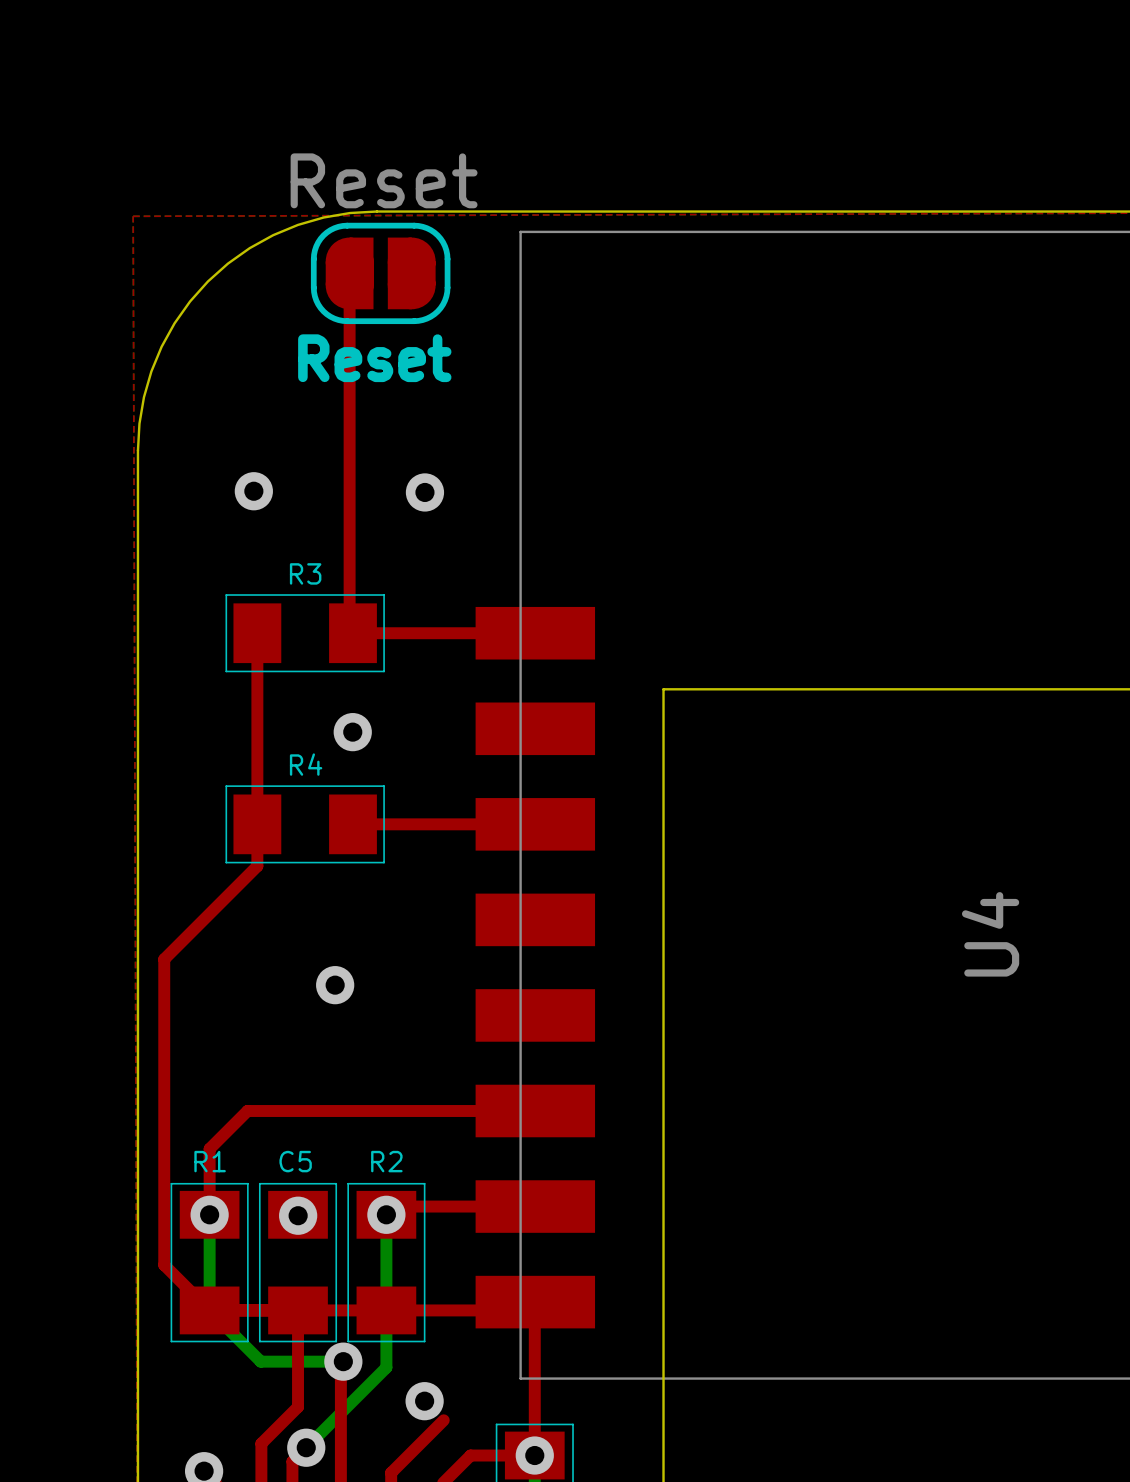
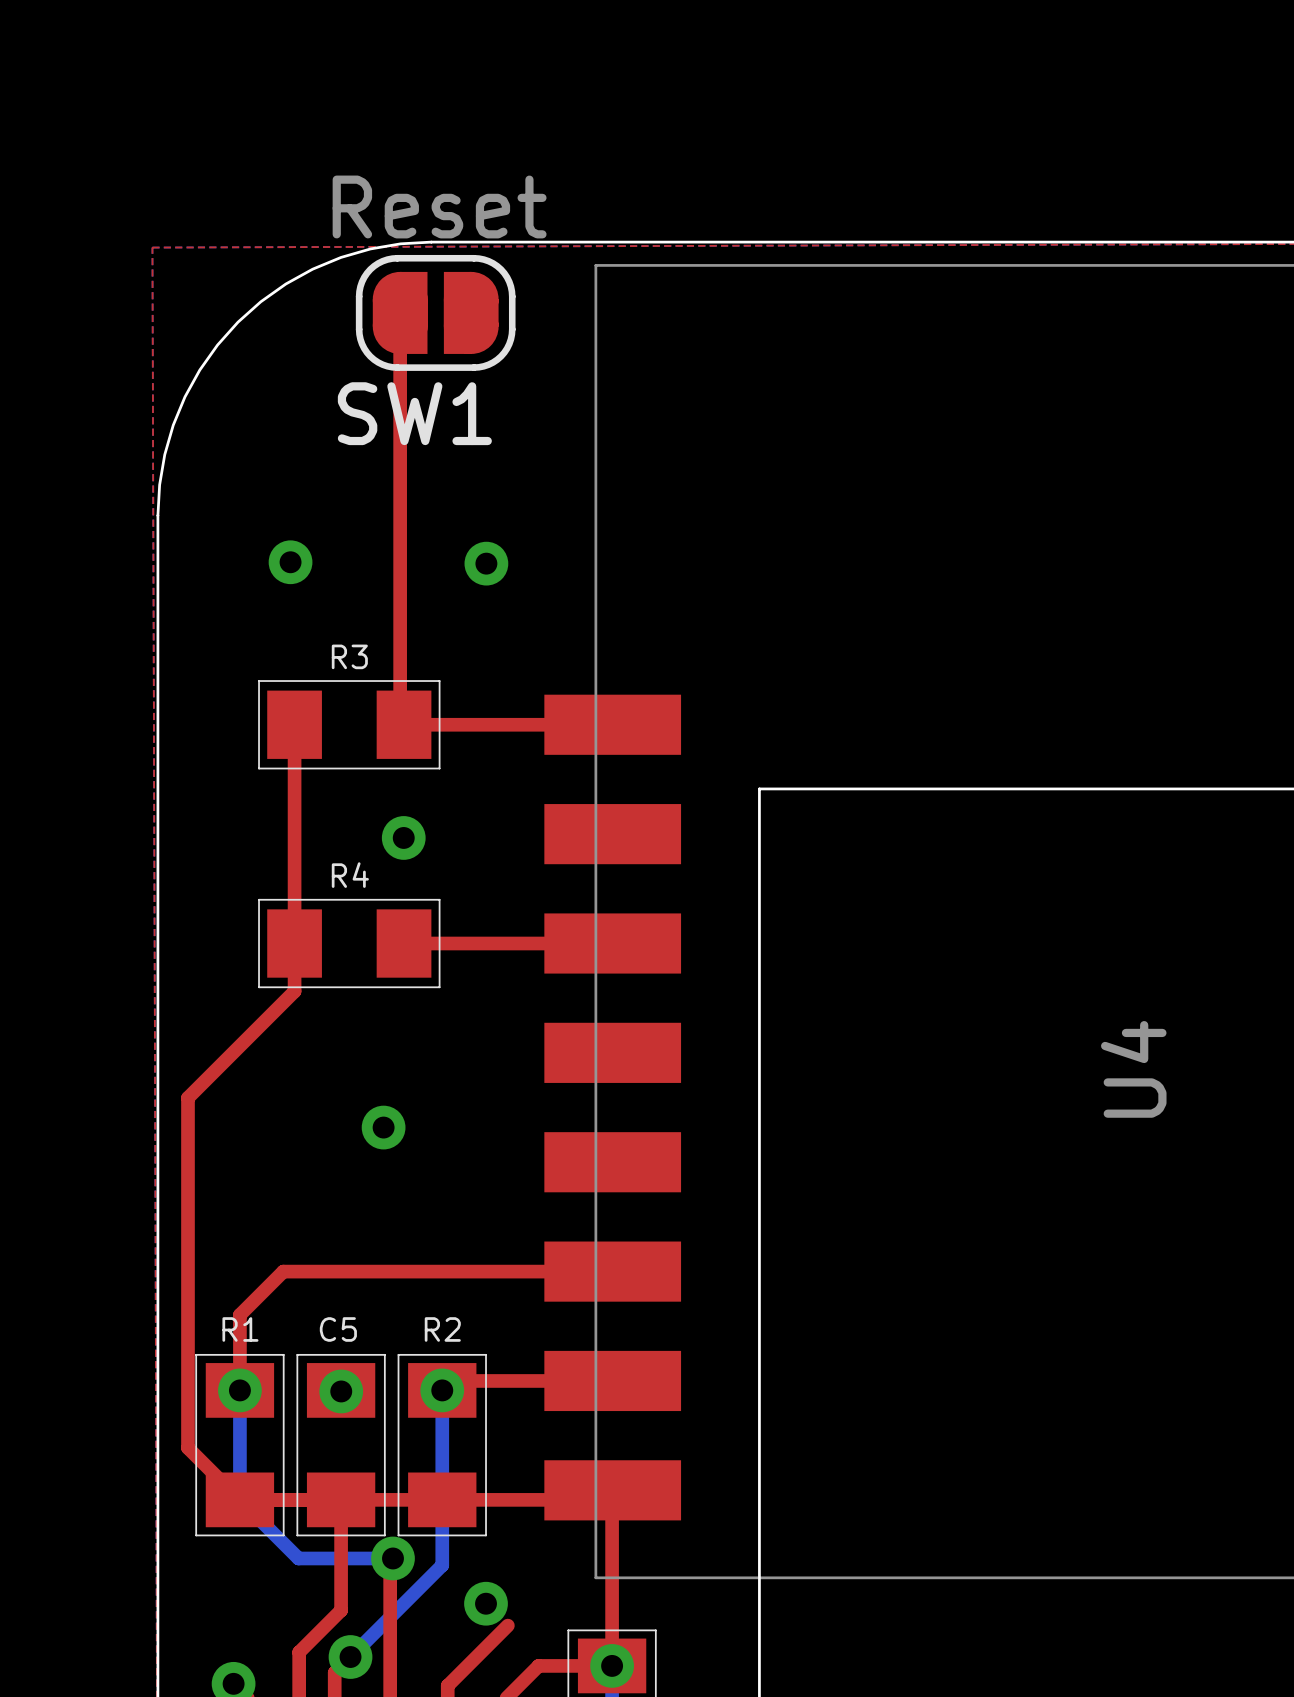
text: Reset (374, 358) -> none
SW1 name: none -> SW1 (414, 413)

